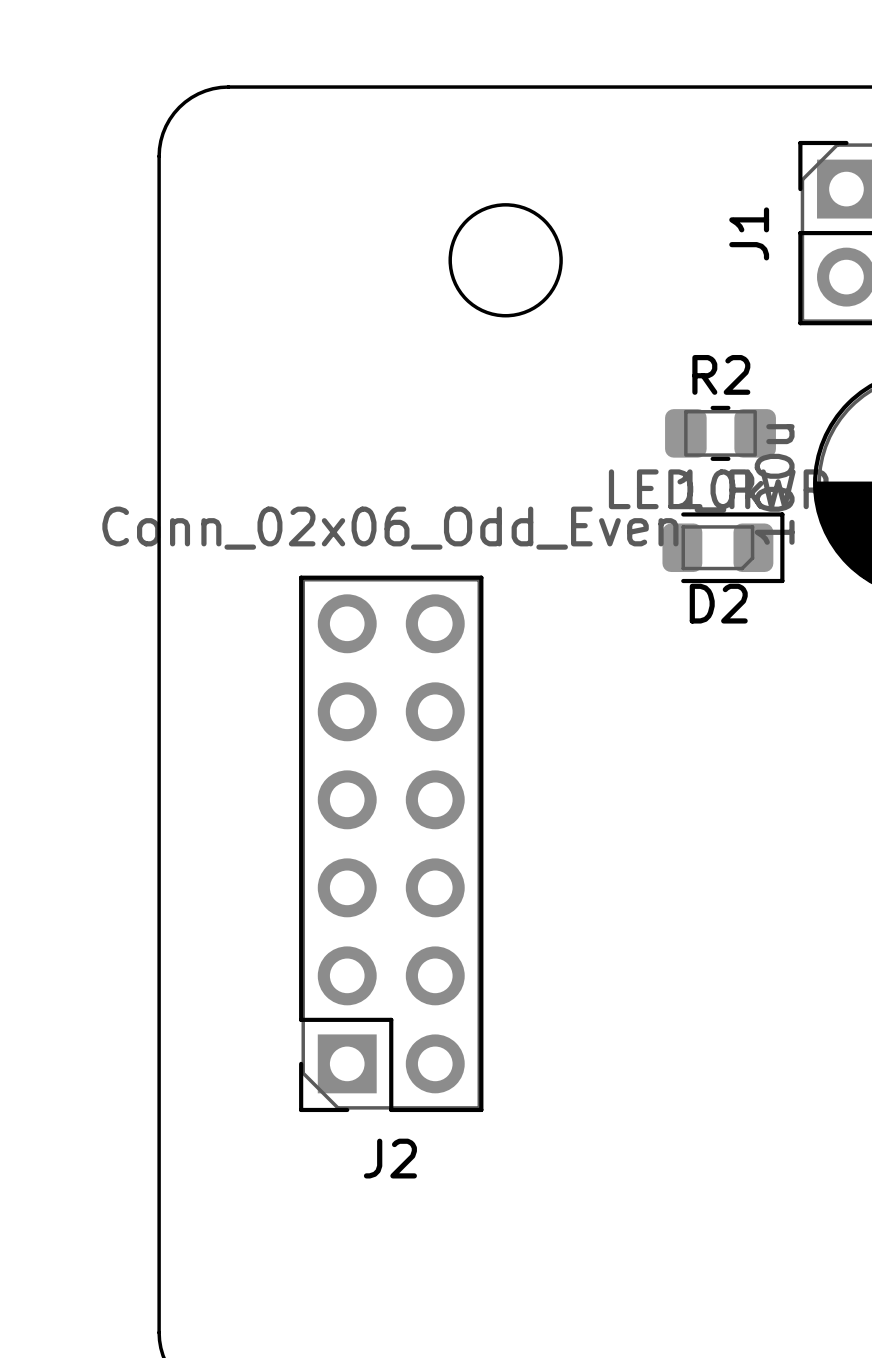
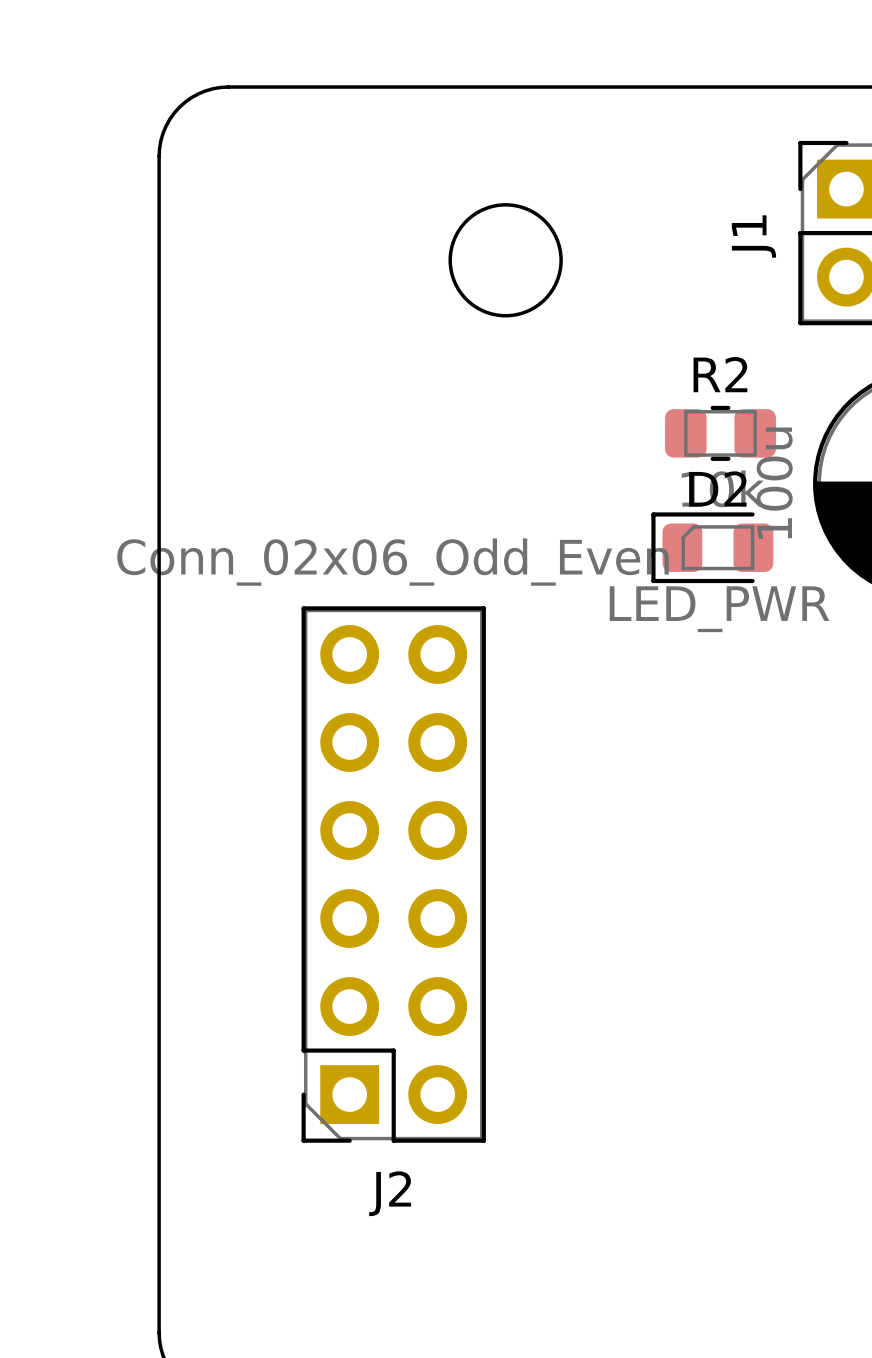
D2 rotation: 0° (723, 547) -> 180° (712, 547)
J2 position: (391, 843) -> (393, 874)

